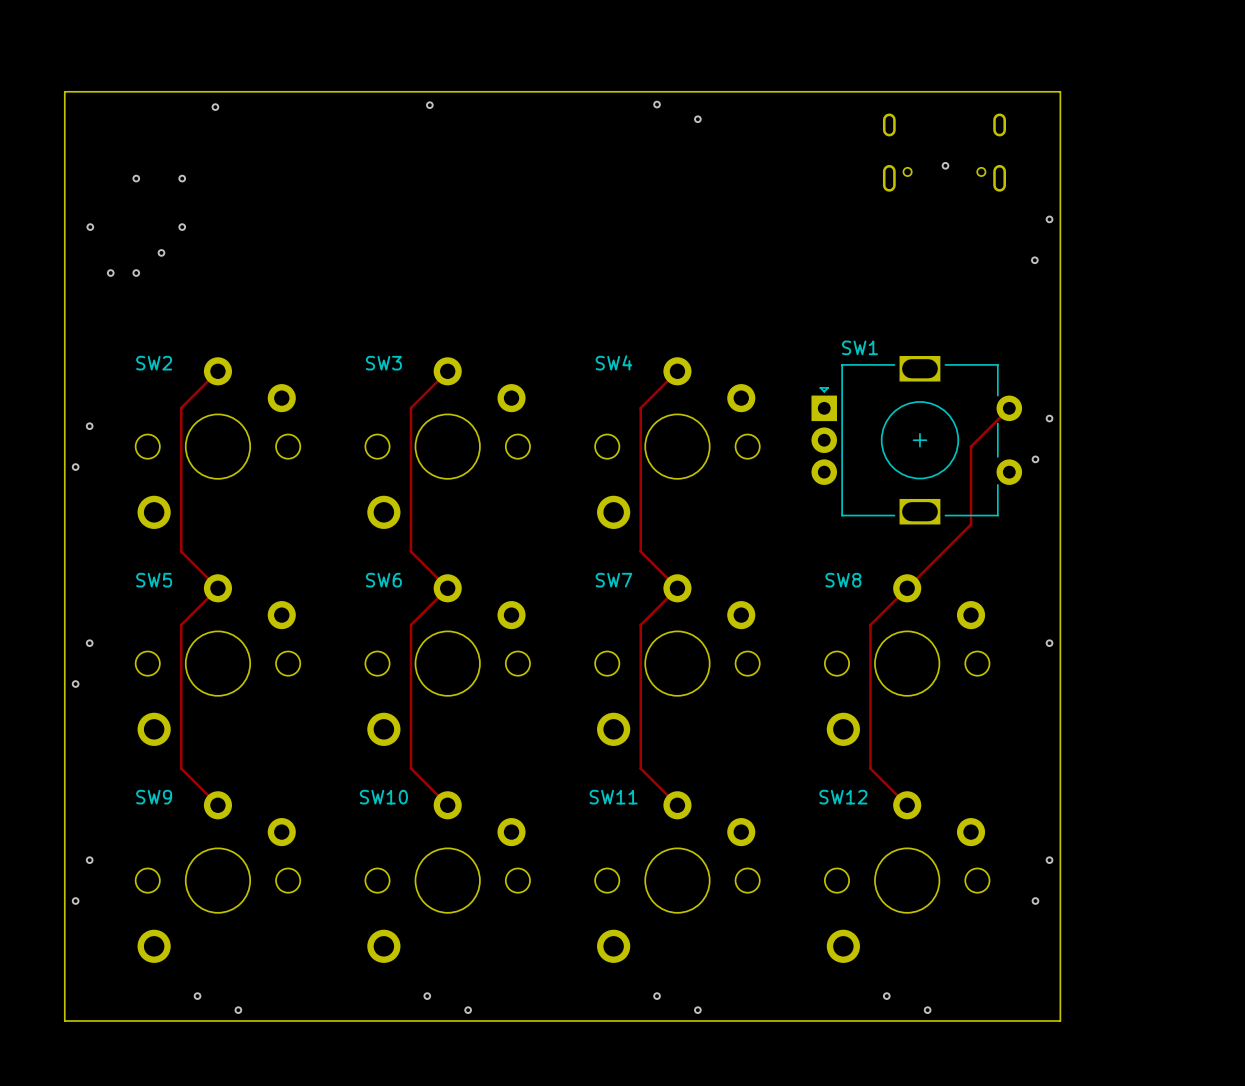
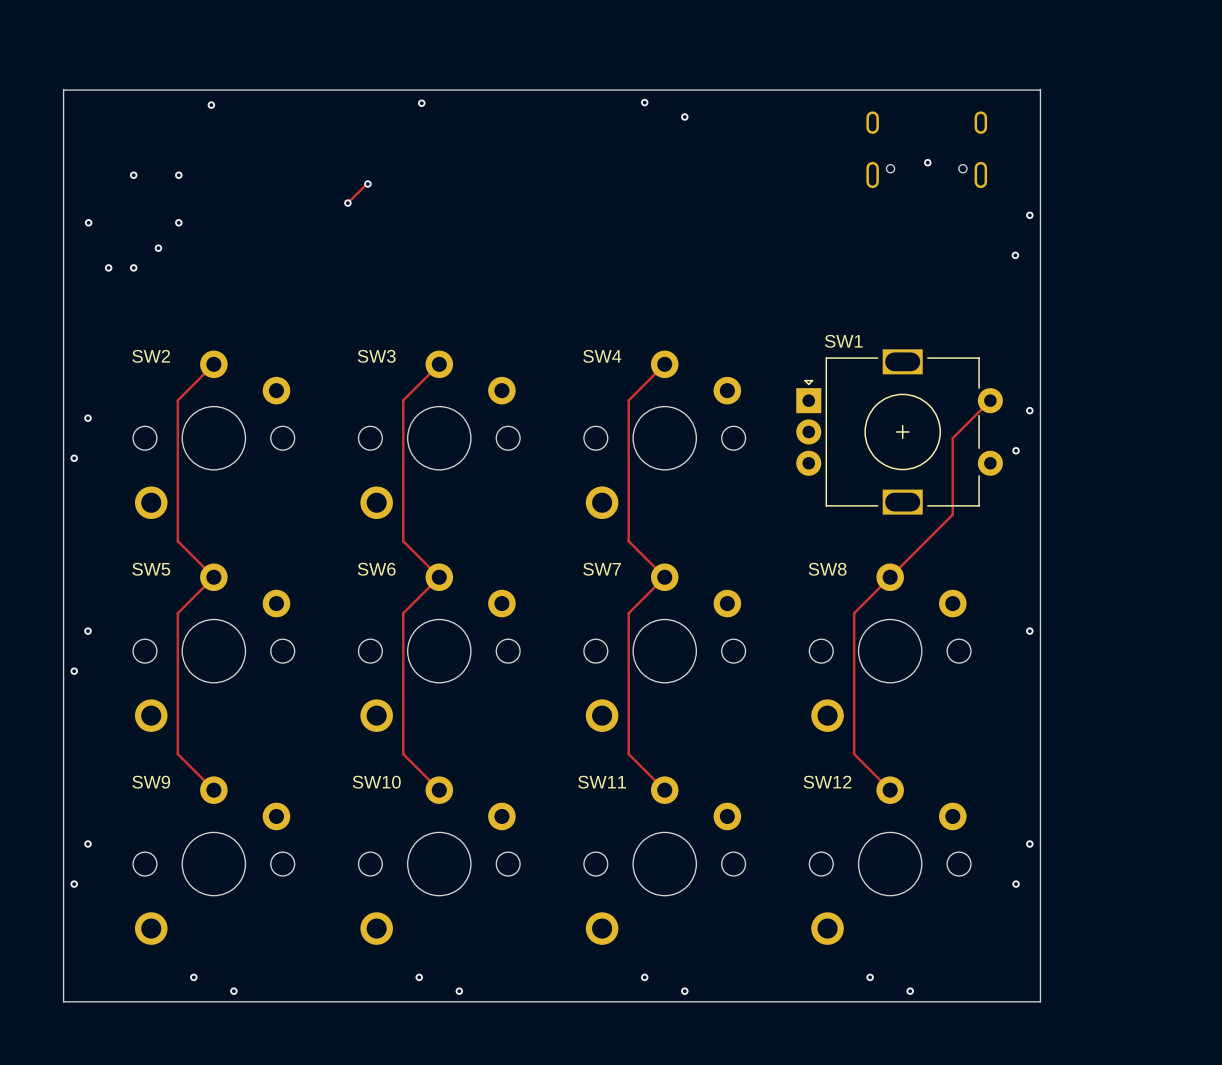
track: none -> (367, 183) (347, 203)
via: none -> (367, 183)
via: none -> (347, 203)

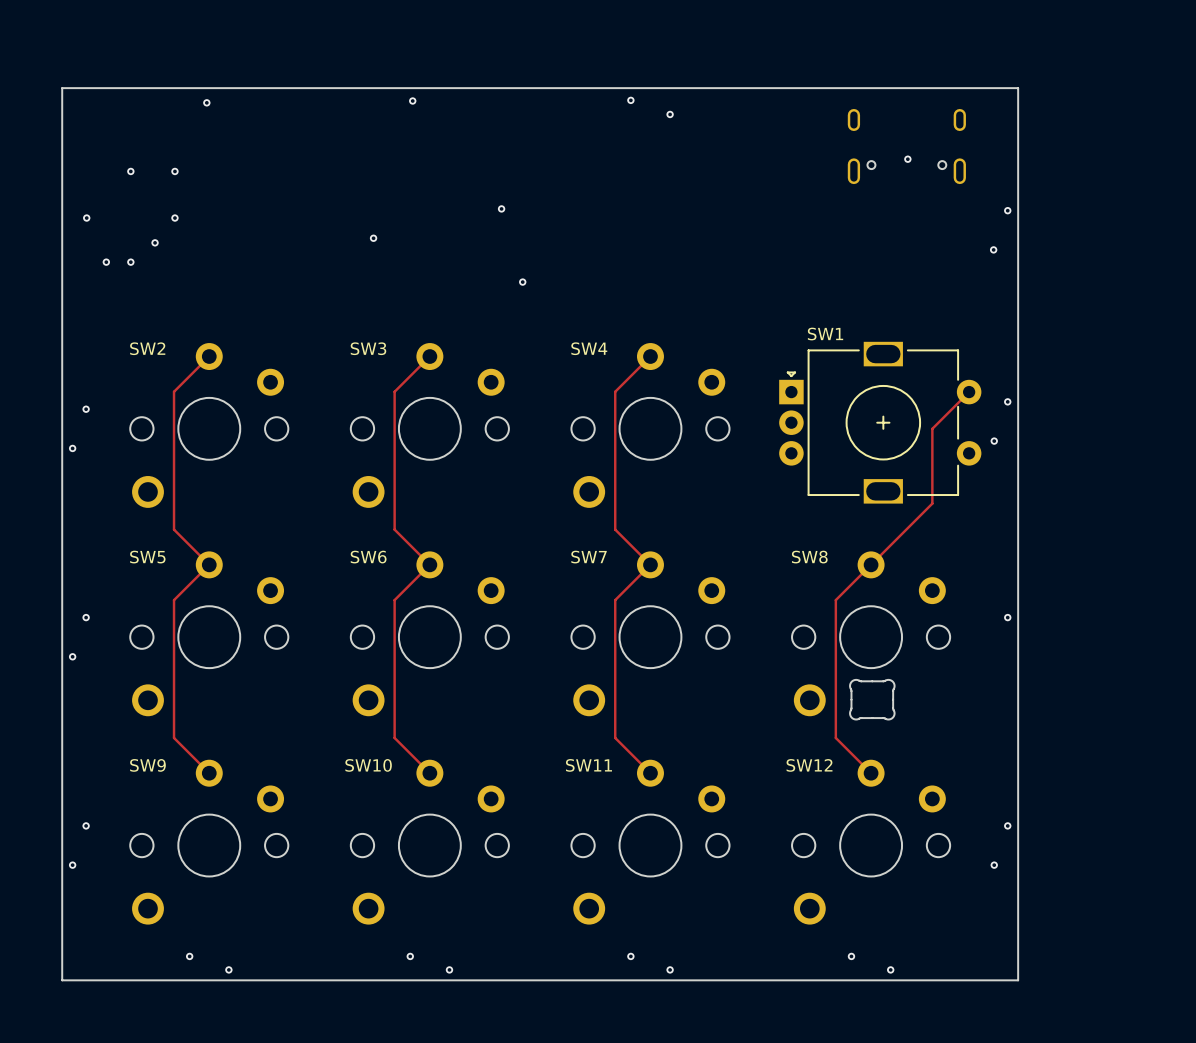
track: (367, 183) (347, 203) -> none
via: (367, 183) -> none
via: (347, 203) -> none
via: none -> (501, 208)
via: none -> (373, 238)
via: none -> (522, 282)
part: none -> (872, 699)

